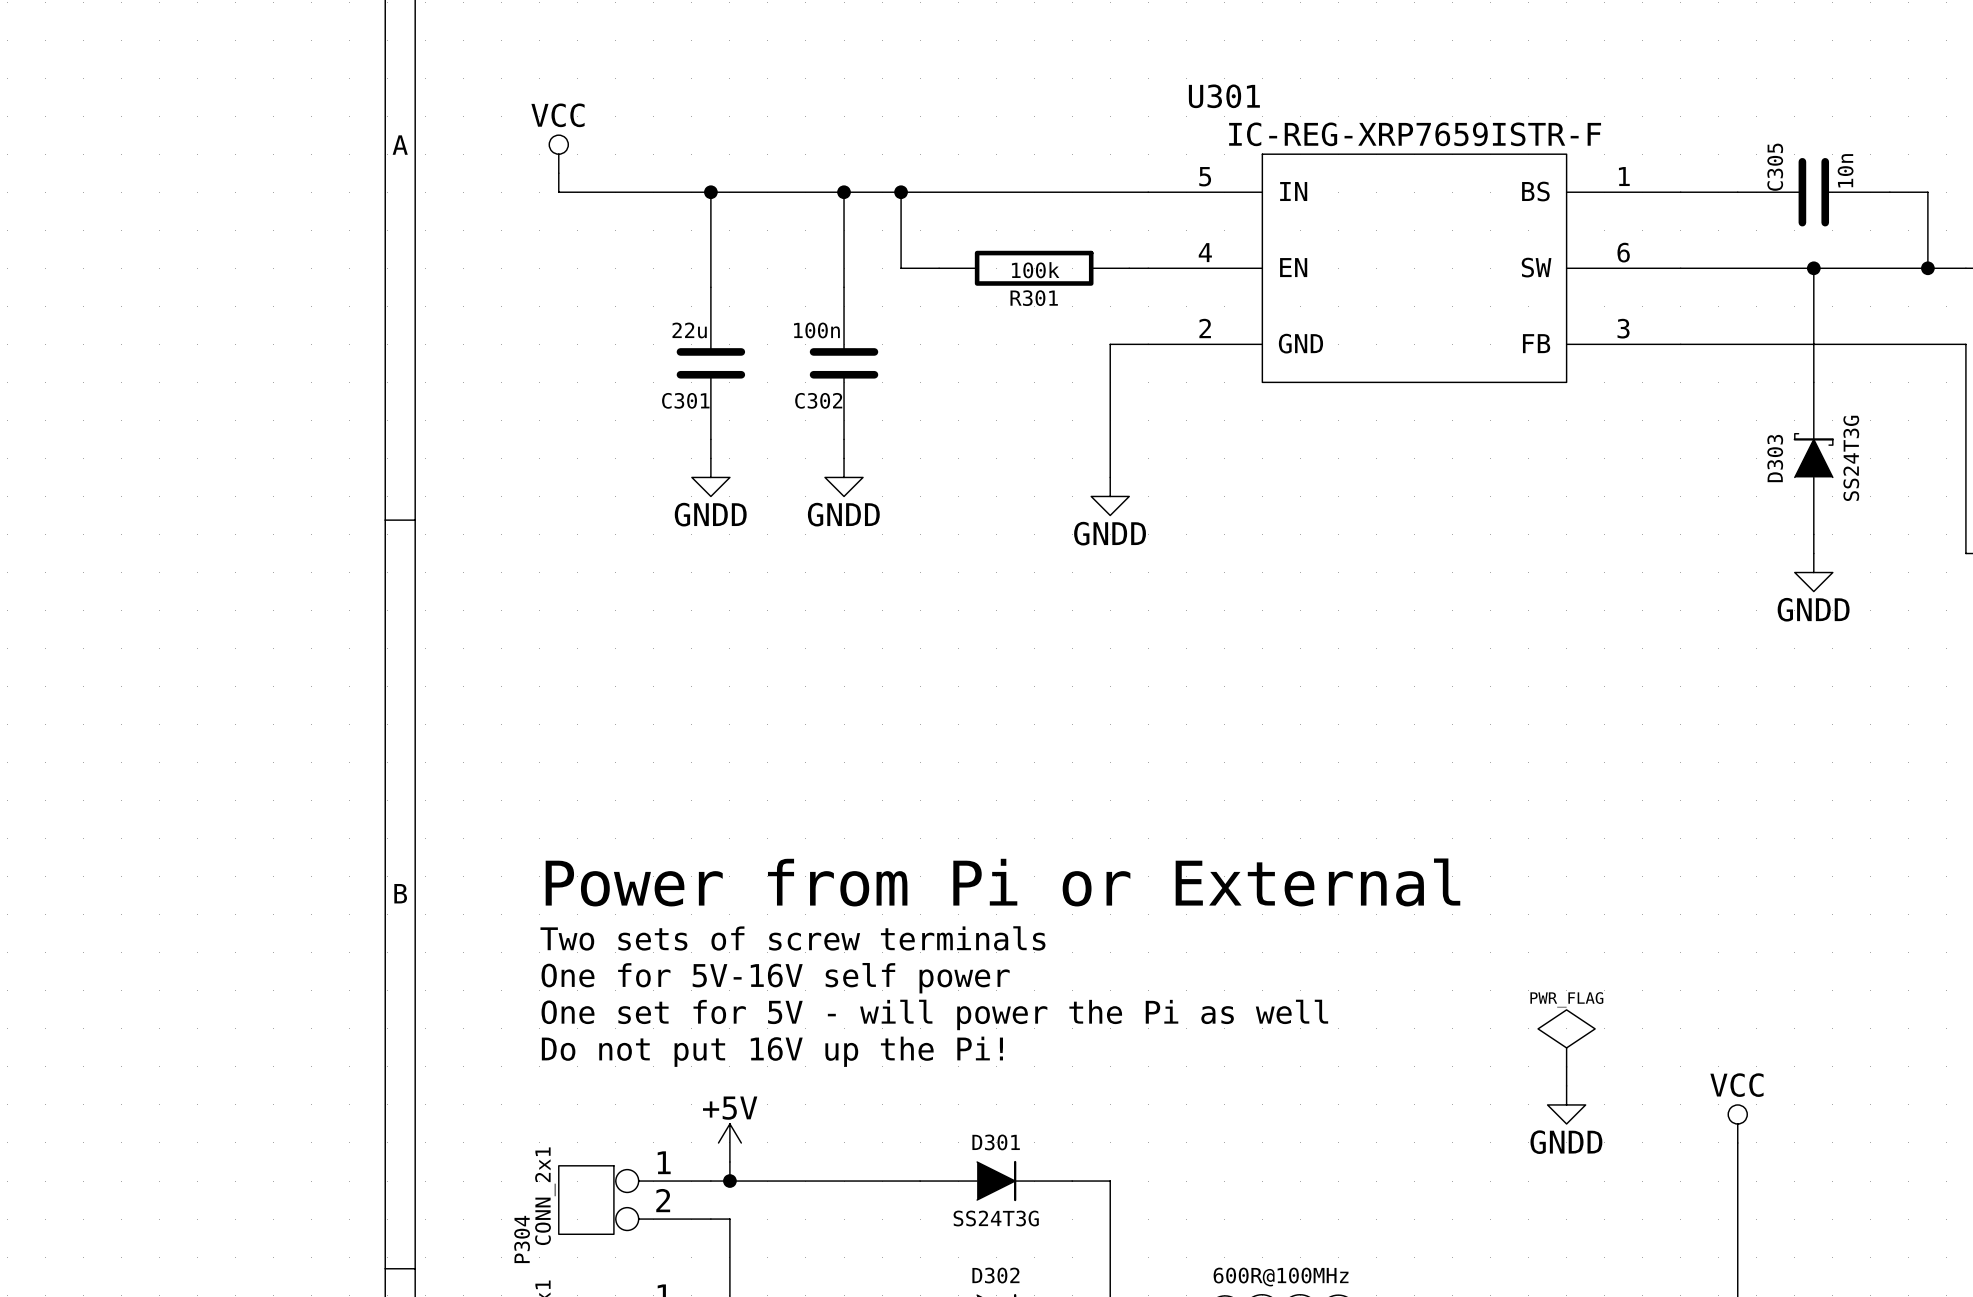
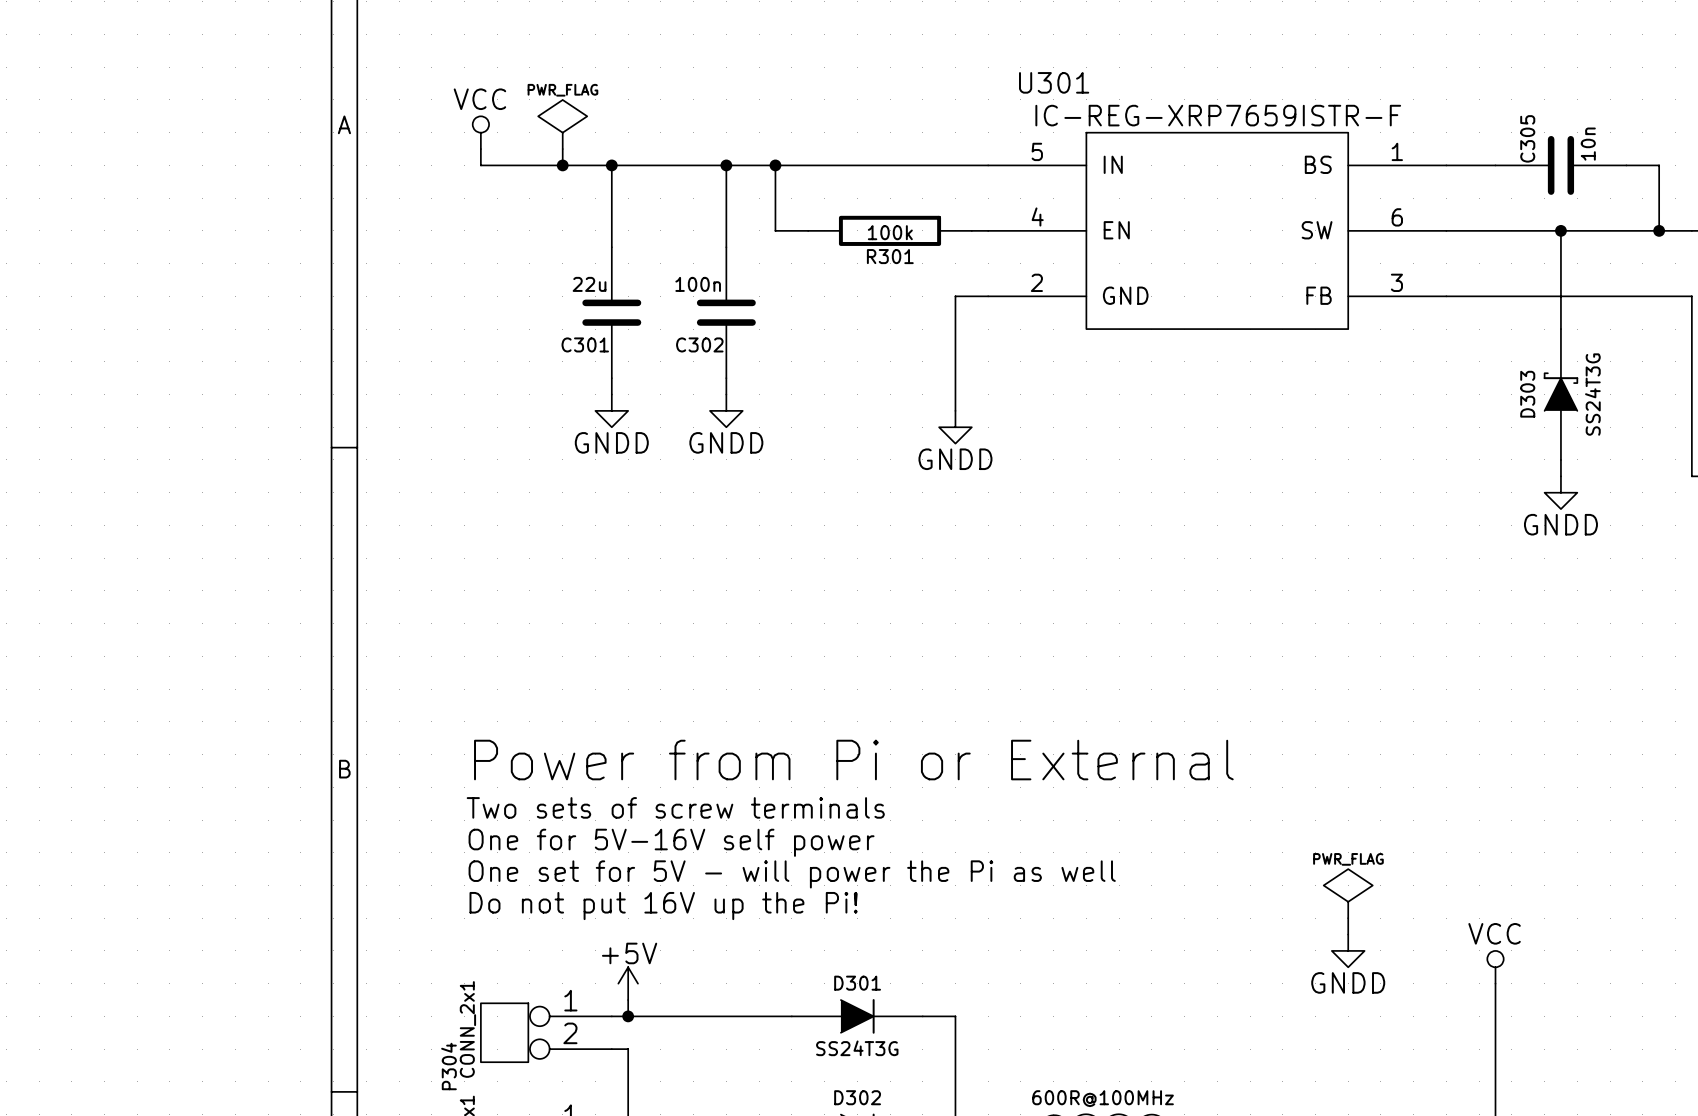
power symbol: none -> PWR_FLAG (562, 124)
wire: none -> (562, 149) (562, 165)
junction: none -> (562, 165)

